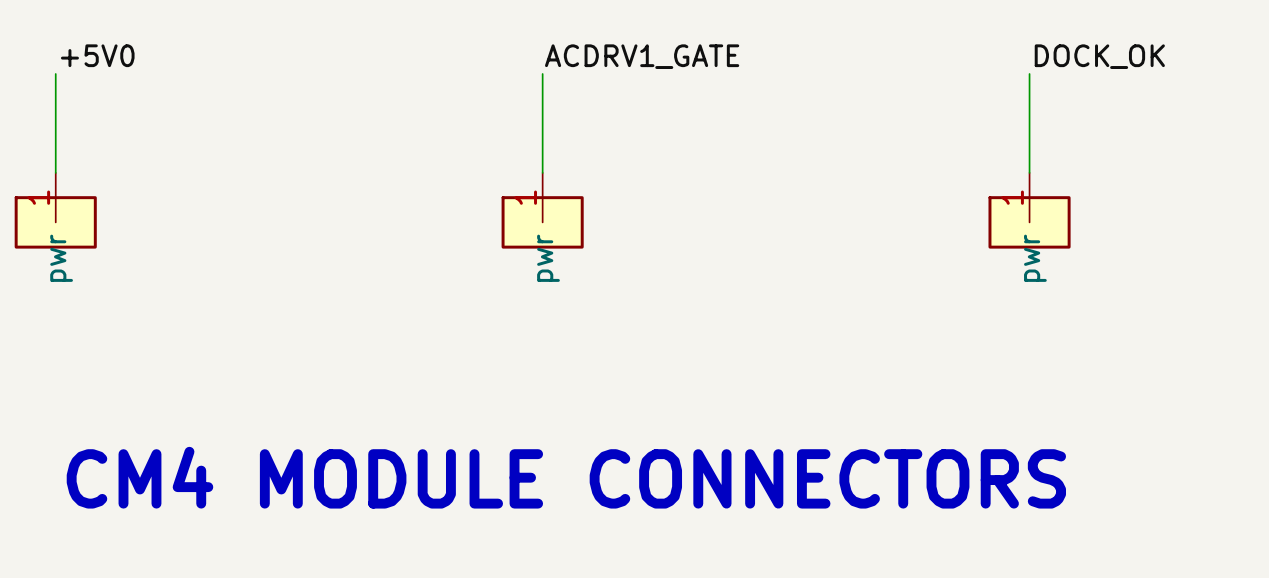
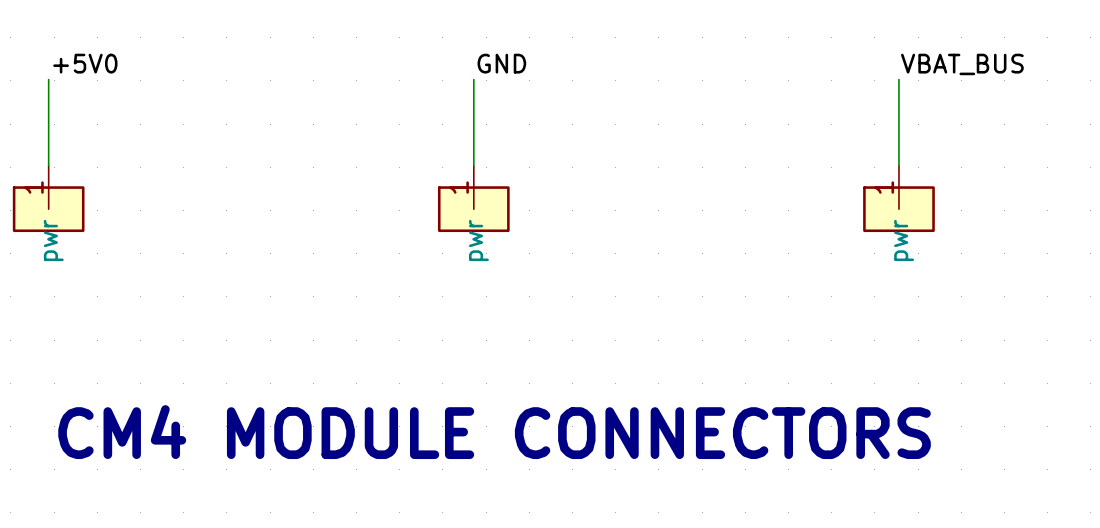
label: ACDRV1_GATE (642, 56) -> GND (501, 63)
label: DOCK_OK (1099, 56) -> VBAT_BUS (962, 64)

